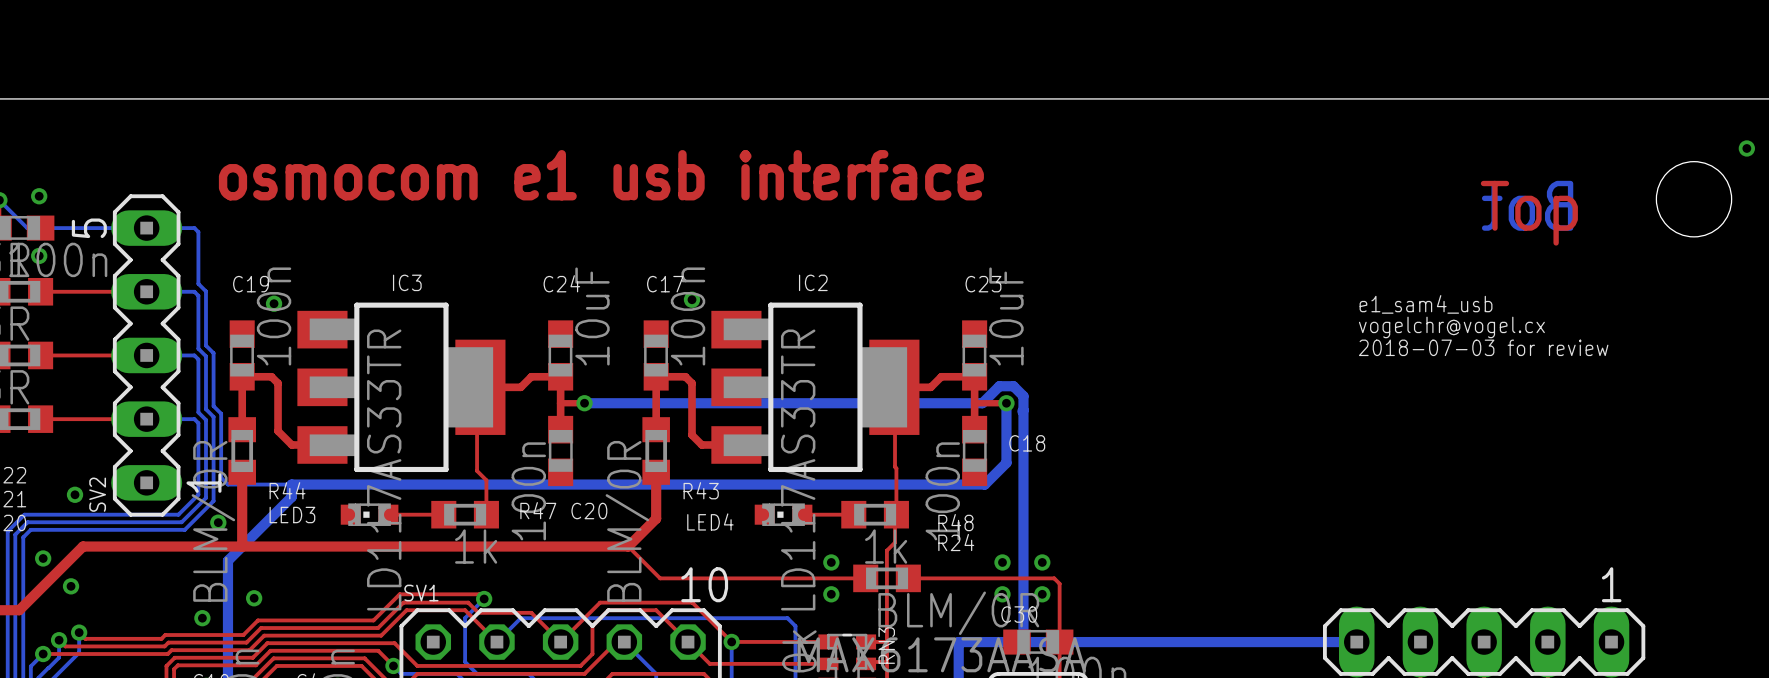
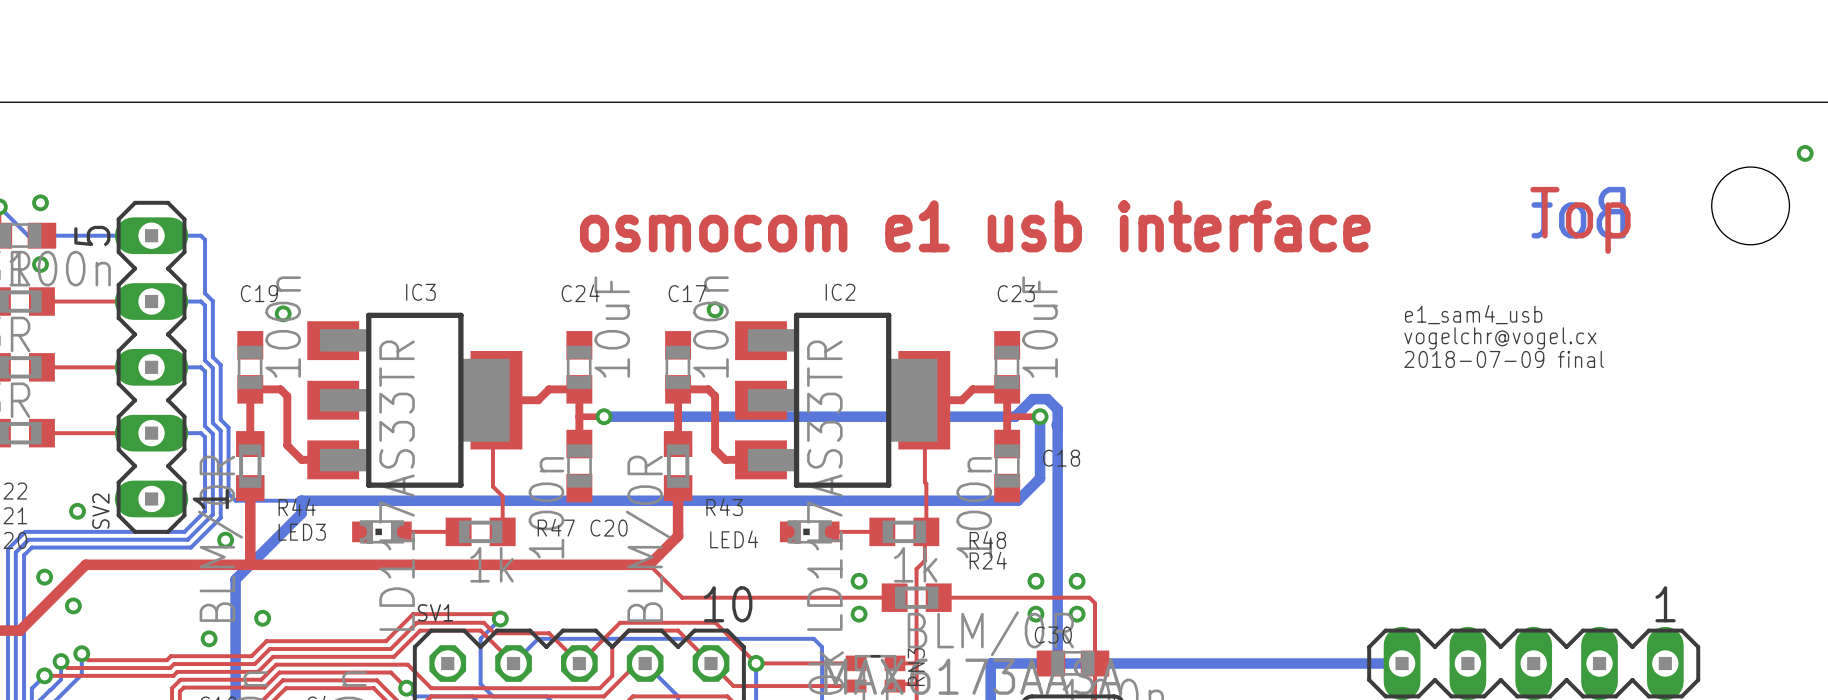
text position: osmocom e1 usb interface (601, 175) -> osmocom e1 usb interface (975, 226)
text: 2018-07-03 for review (1483, 347) -> 2018-07-09 final (1504, 359)

